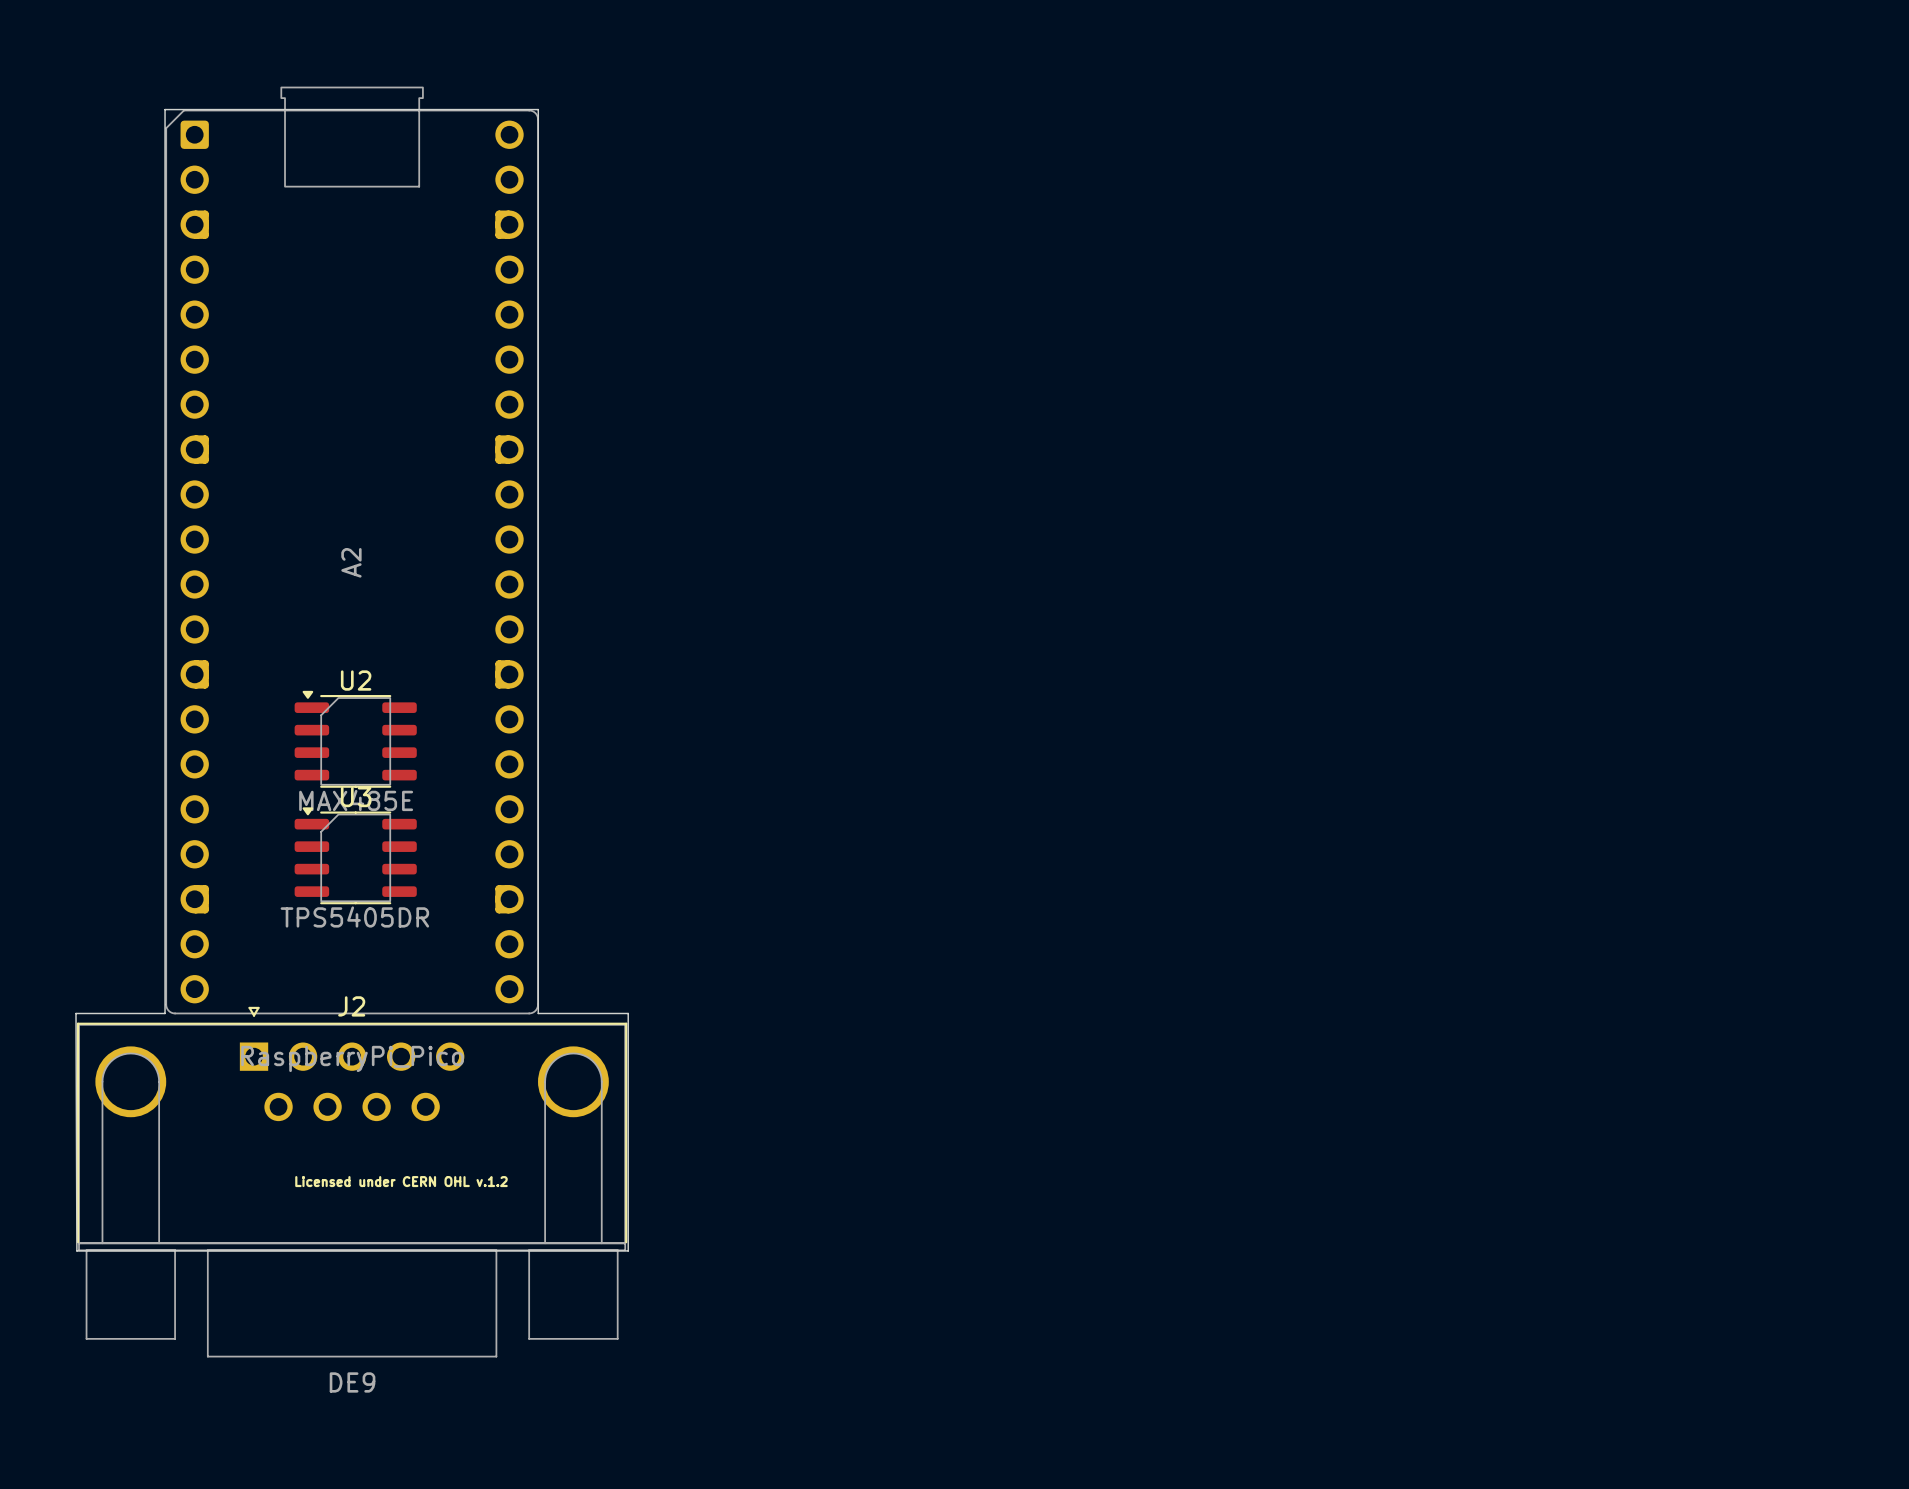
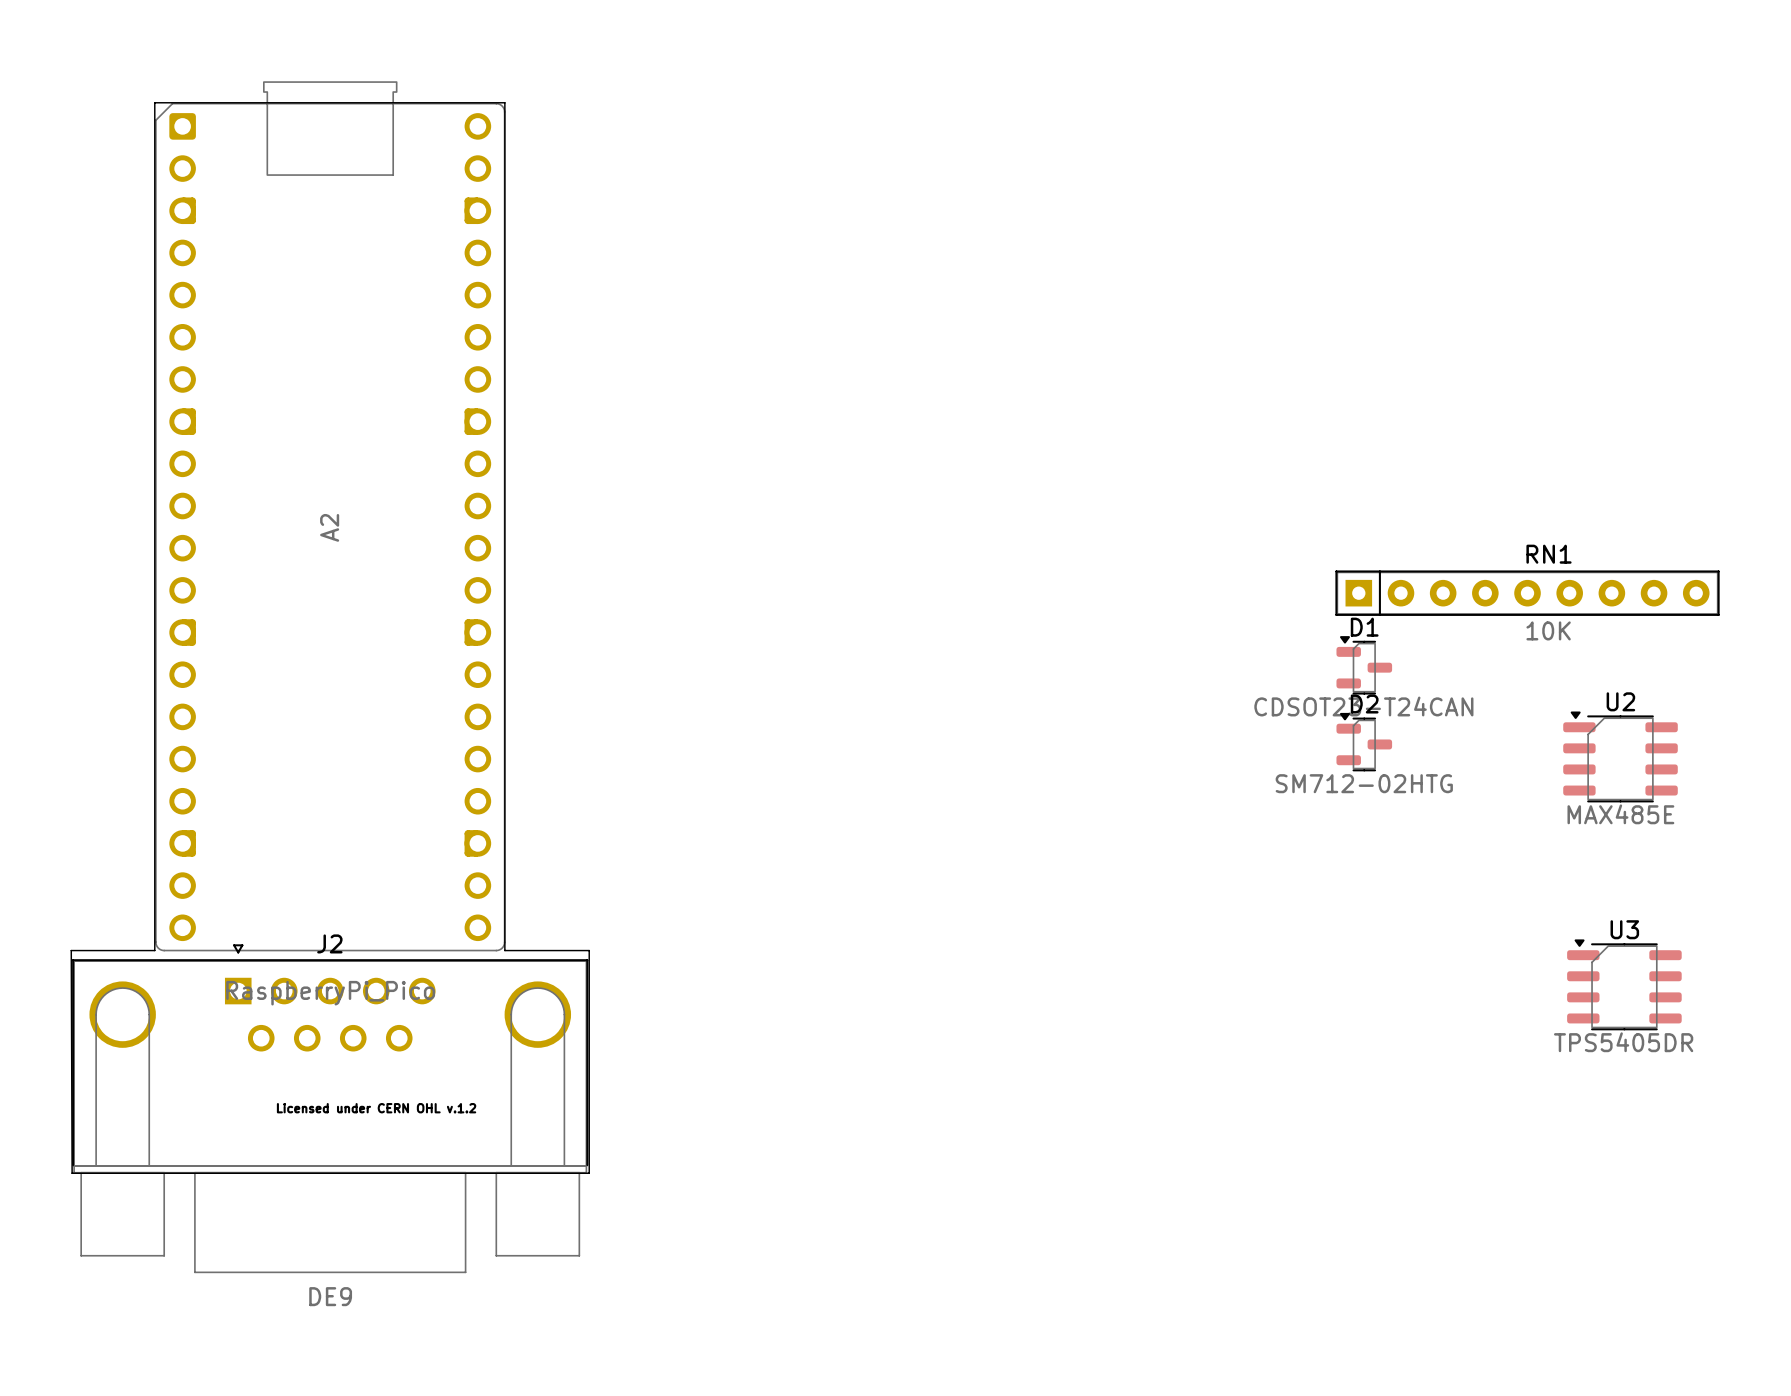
RN1: none -> 10K (1527, 593)
D1: none -> CDSOT23-T24CAN (1364, 665)
U2 position: (355, 739) -> (1620, 756)
D2: none -> SM712-02HTG (1364, 742)
U3 position: (355, 855) -> (1624, 984)

